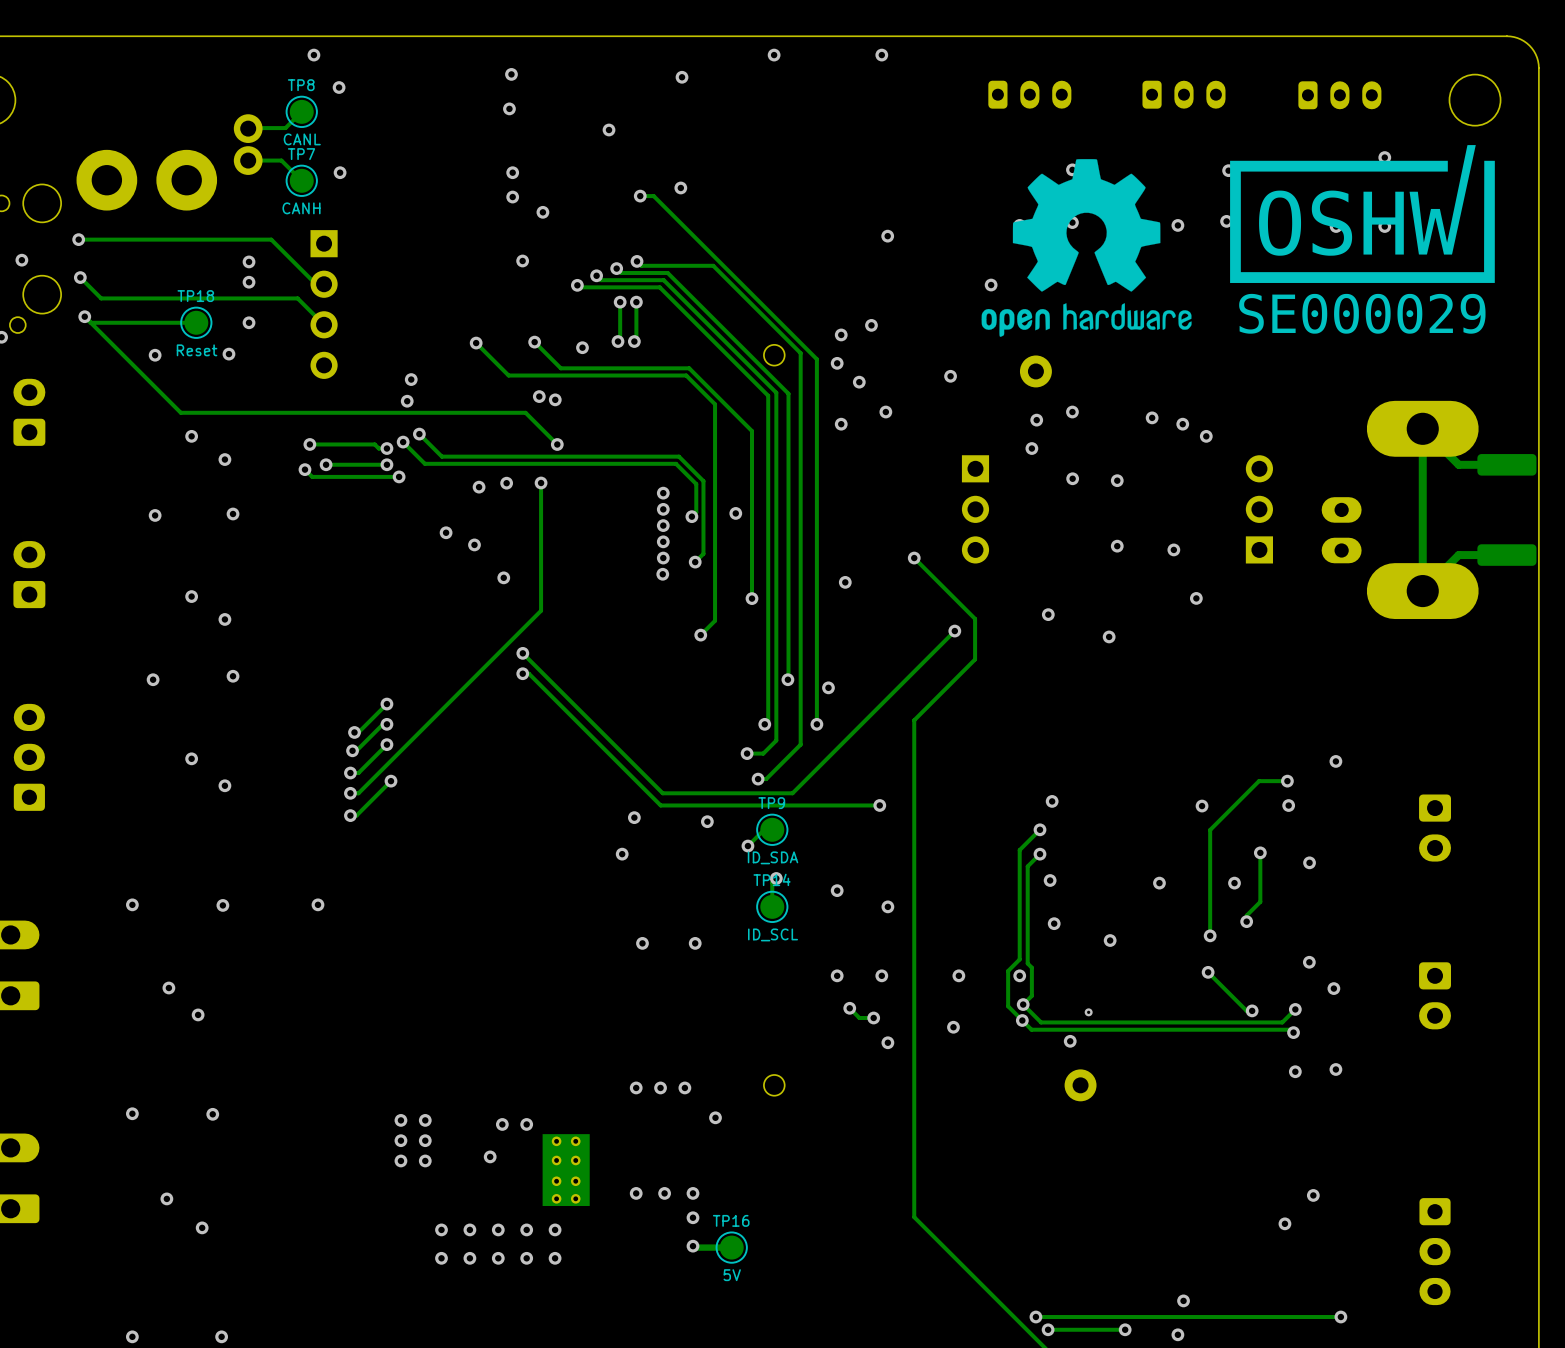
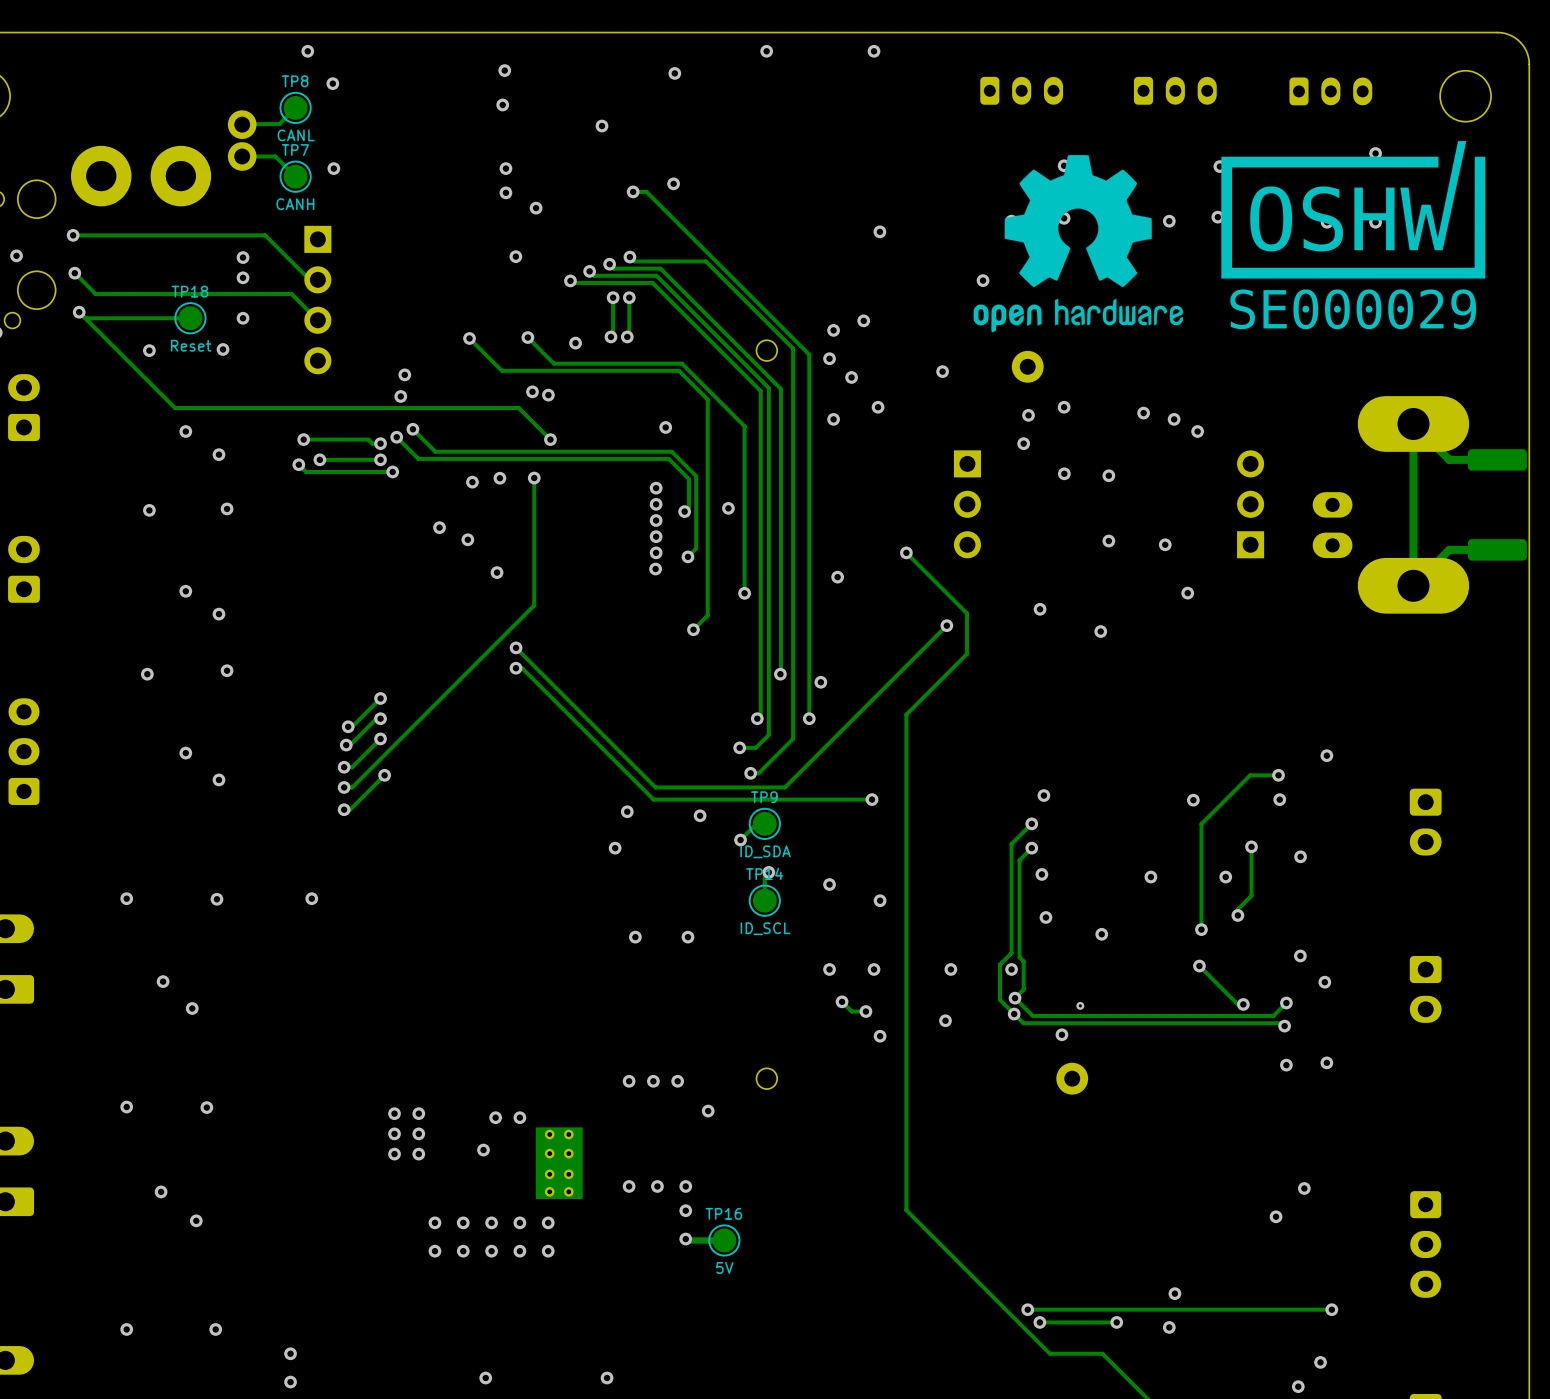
via: none -> (665, 427)

